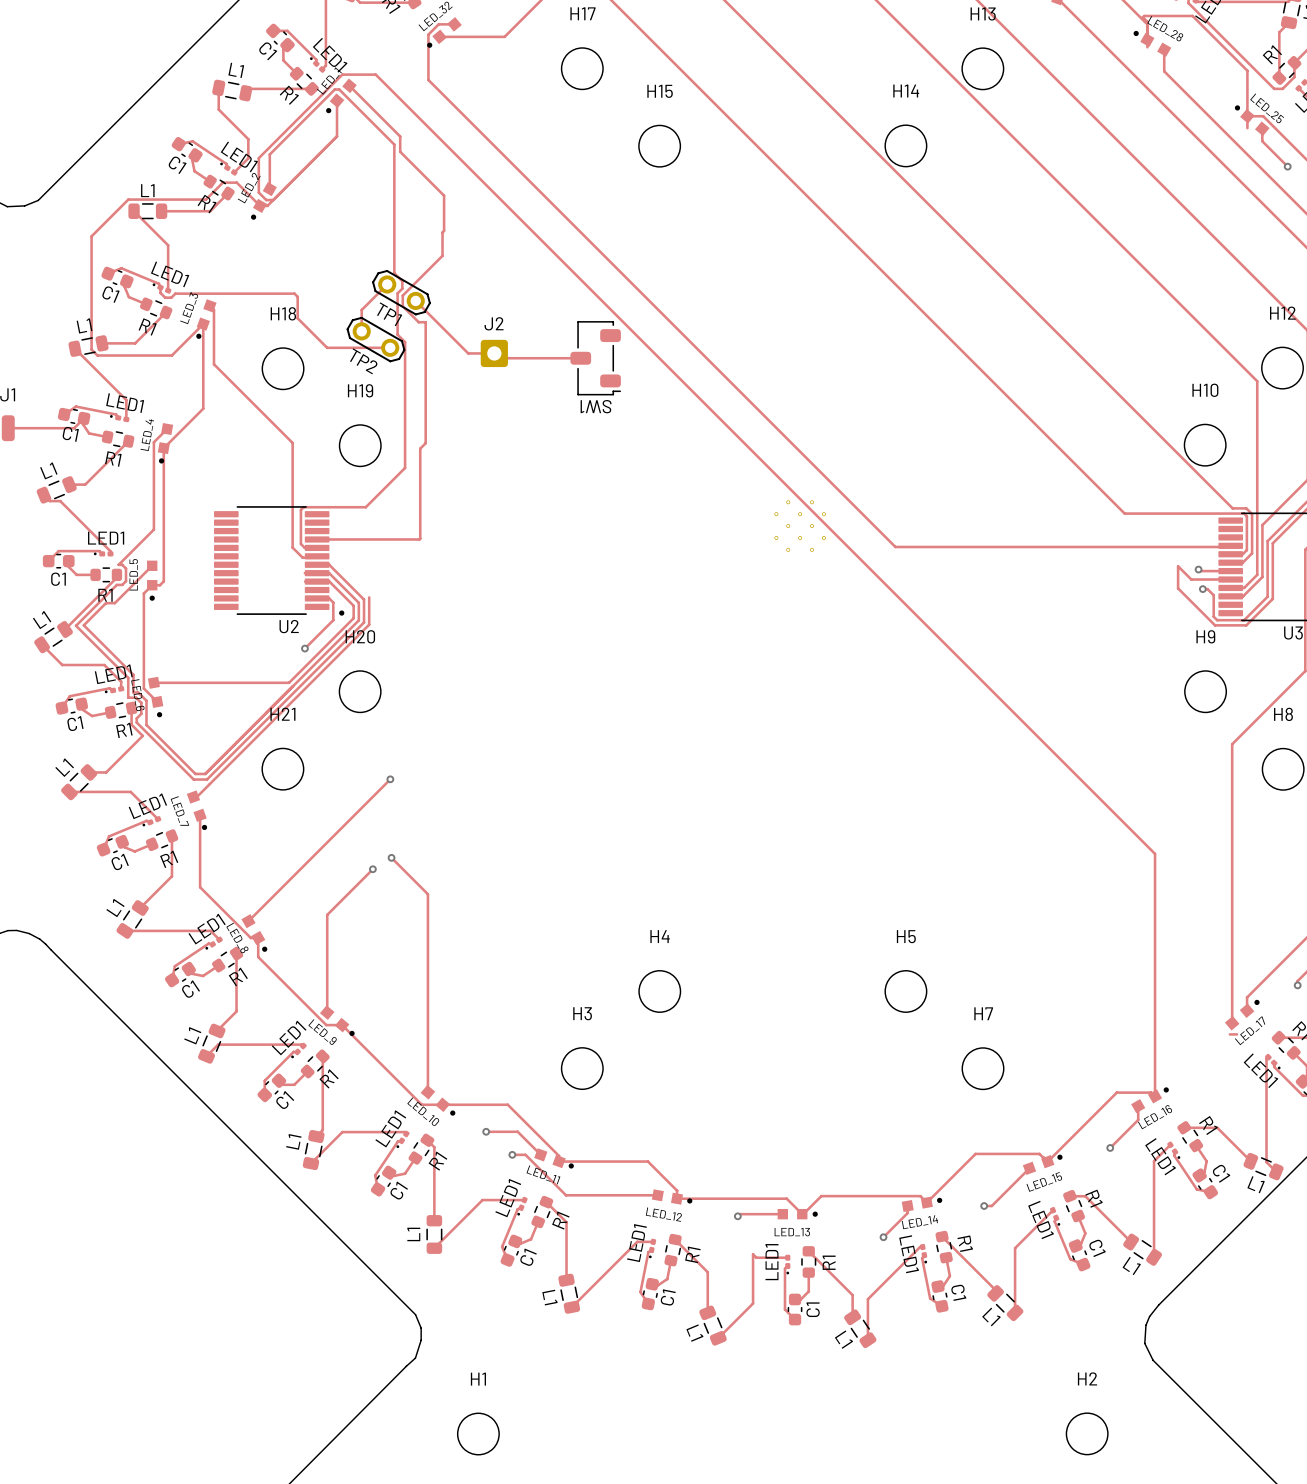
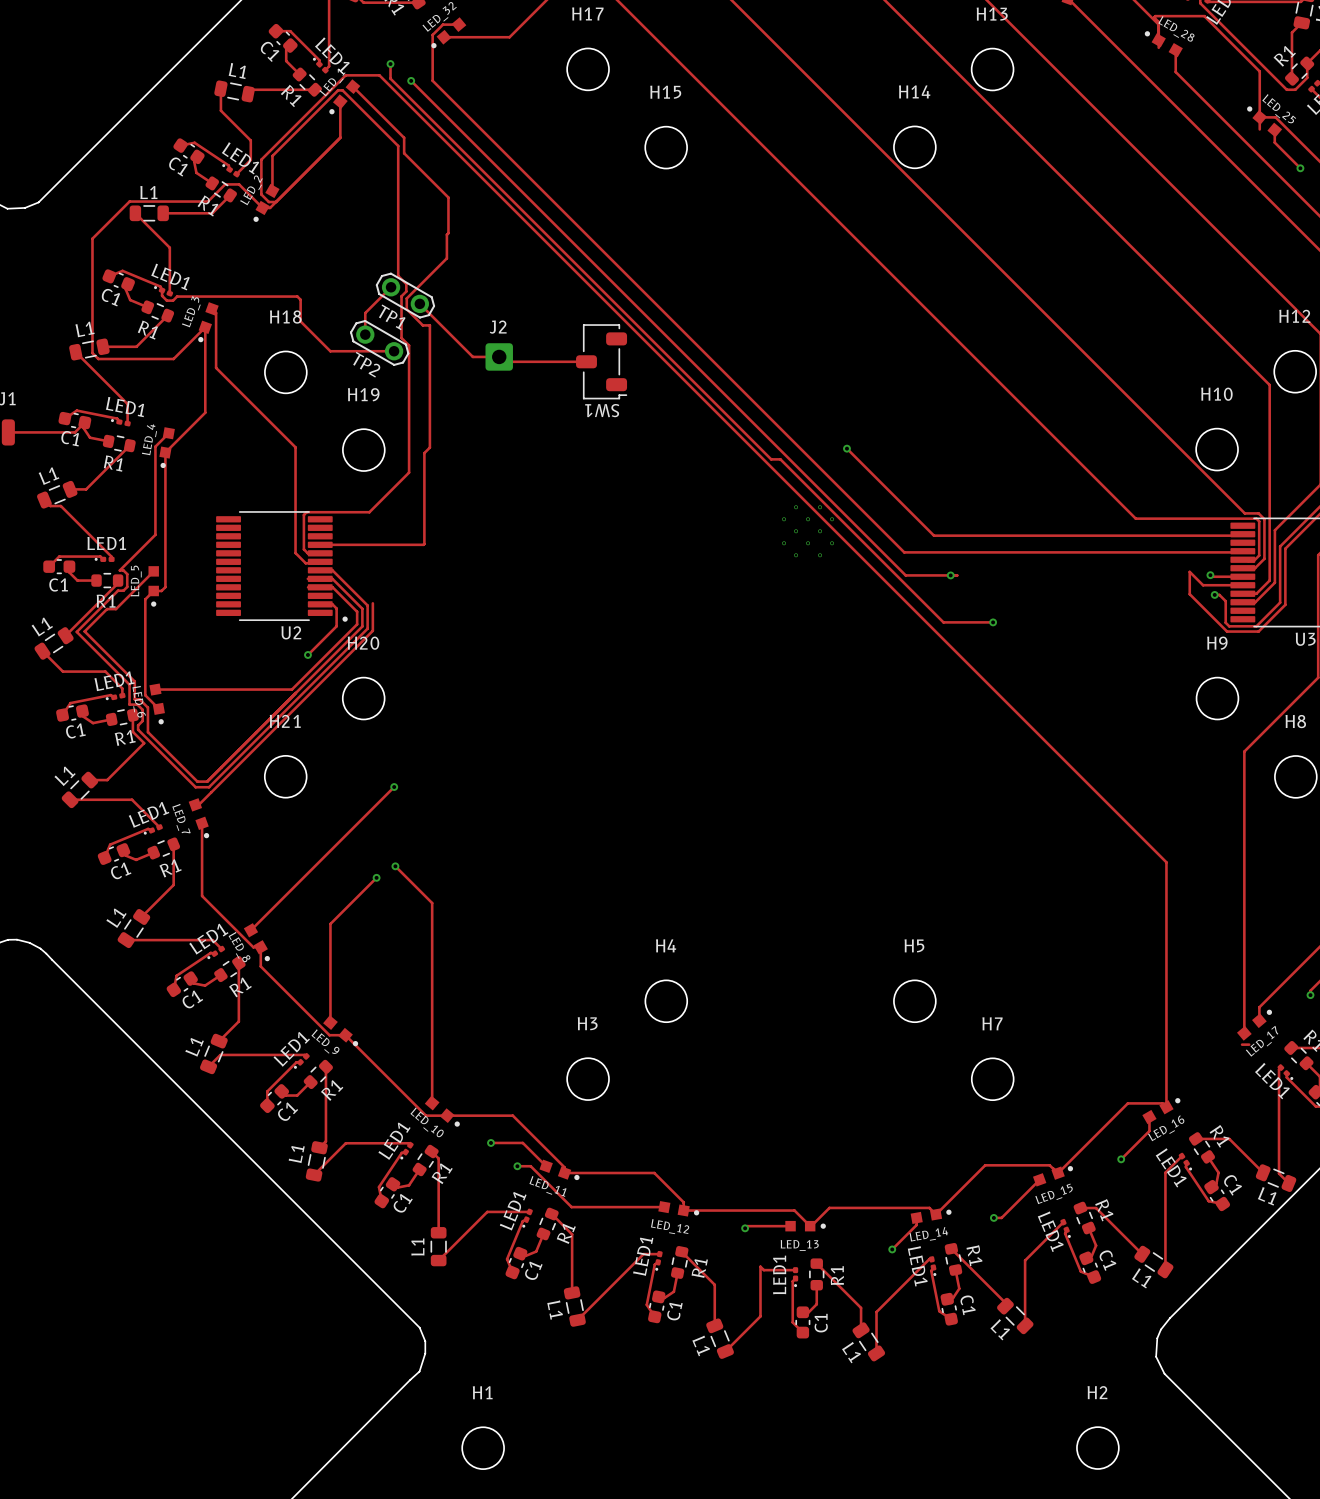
track: none -> (390, 64) (390, 78) (771, 459) (780, 459) (943, 622) (993, 622)
via: none -> (390, 64)
track: none -> (410, 79) (905, 575) (957, 575)
via: none -> (411, 80)
track: none -> (846, 448) (933, 535) (1248, 535)
via: none -> (846, 448)
via: none -> (950, 575)
via: none -> (993, 622)

